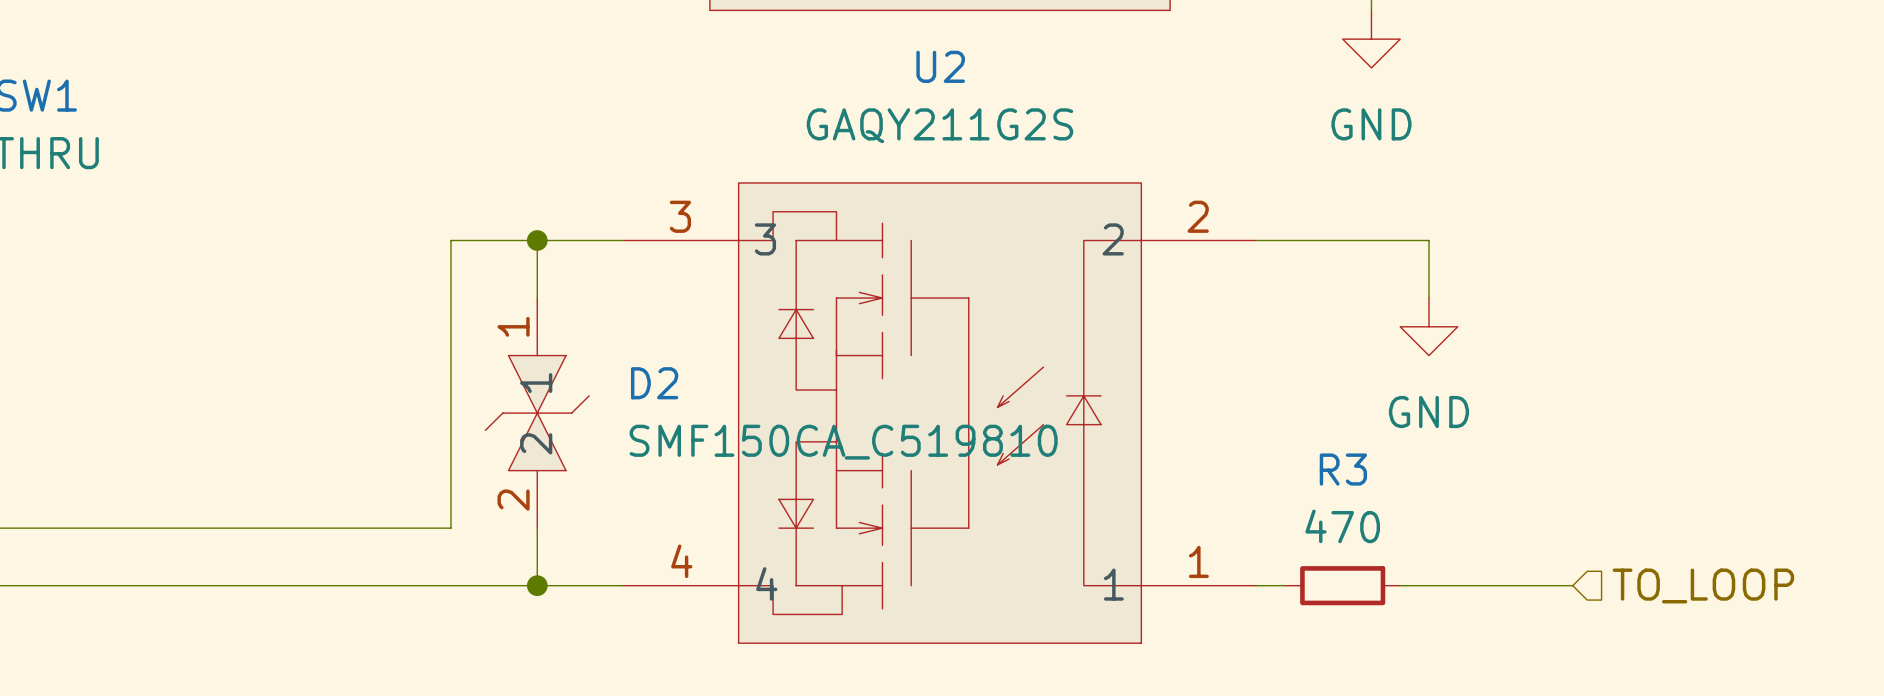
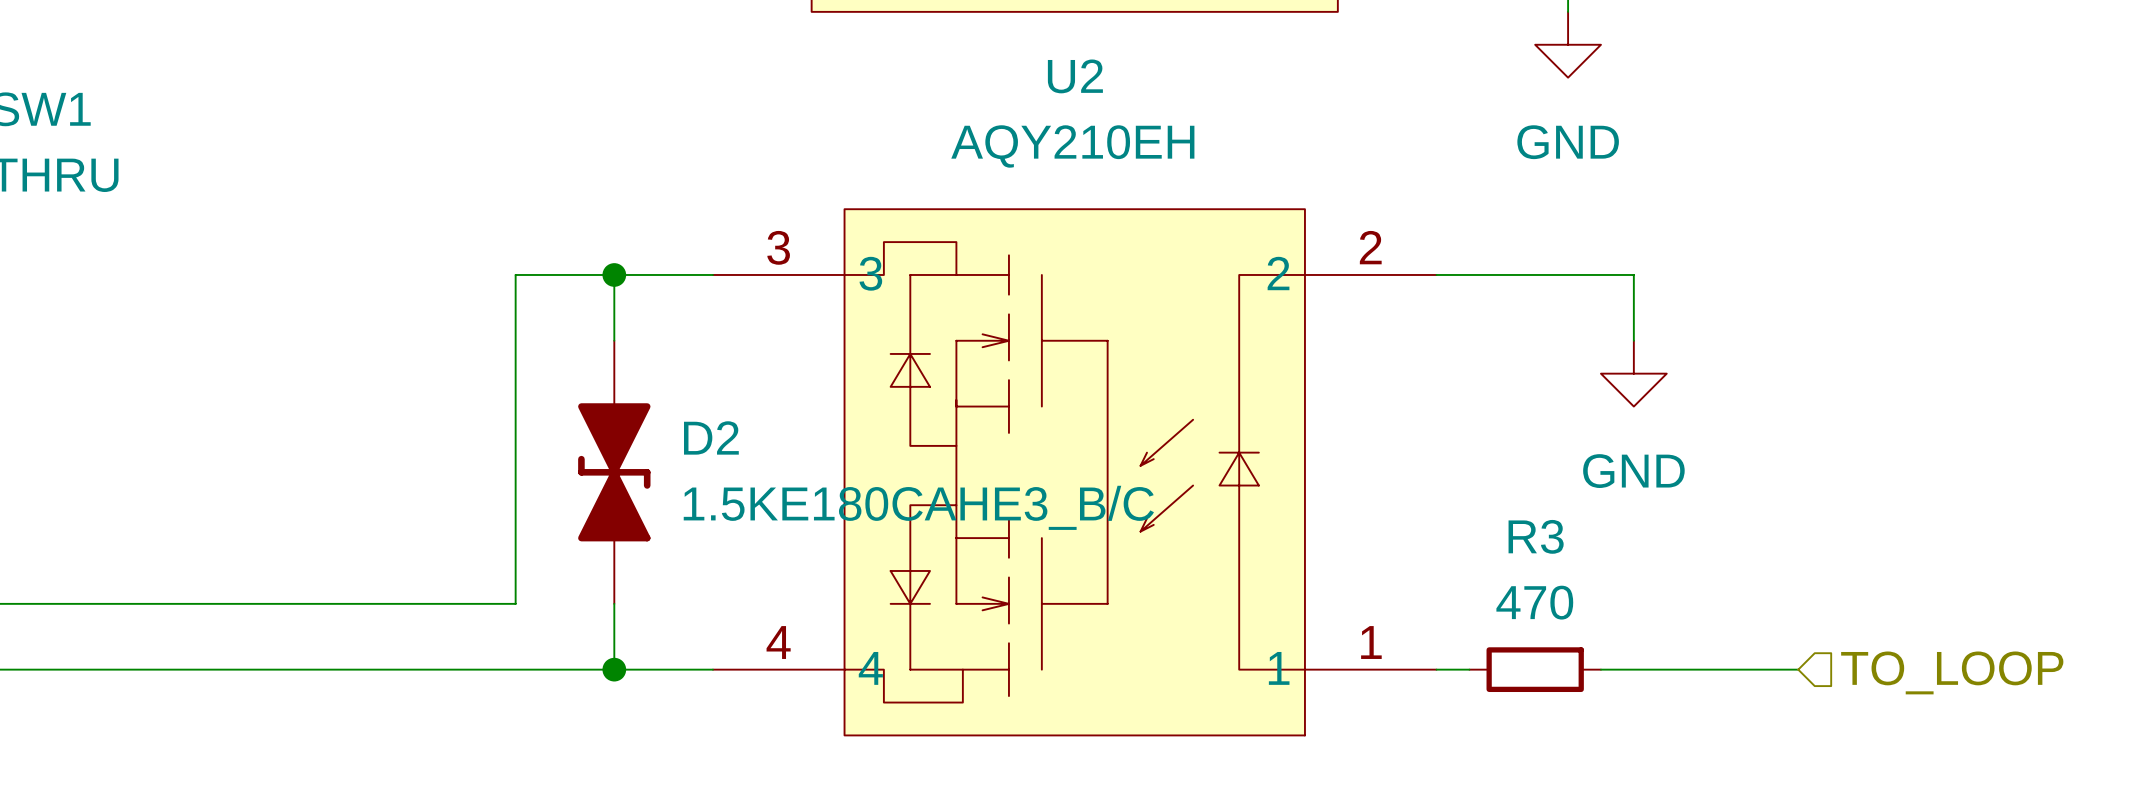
U2 value: GAQY211G2S (939, 125) -> AQY210EH (1072, 146)
D2 symbol: [485, 298, 590, 529] -> [578, 340, 651, 604]
D2 value: SMF150CA_C519810 (843, 442) -> 1.5KE180CAHE3_B/C (918, 507)

